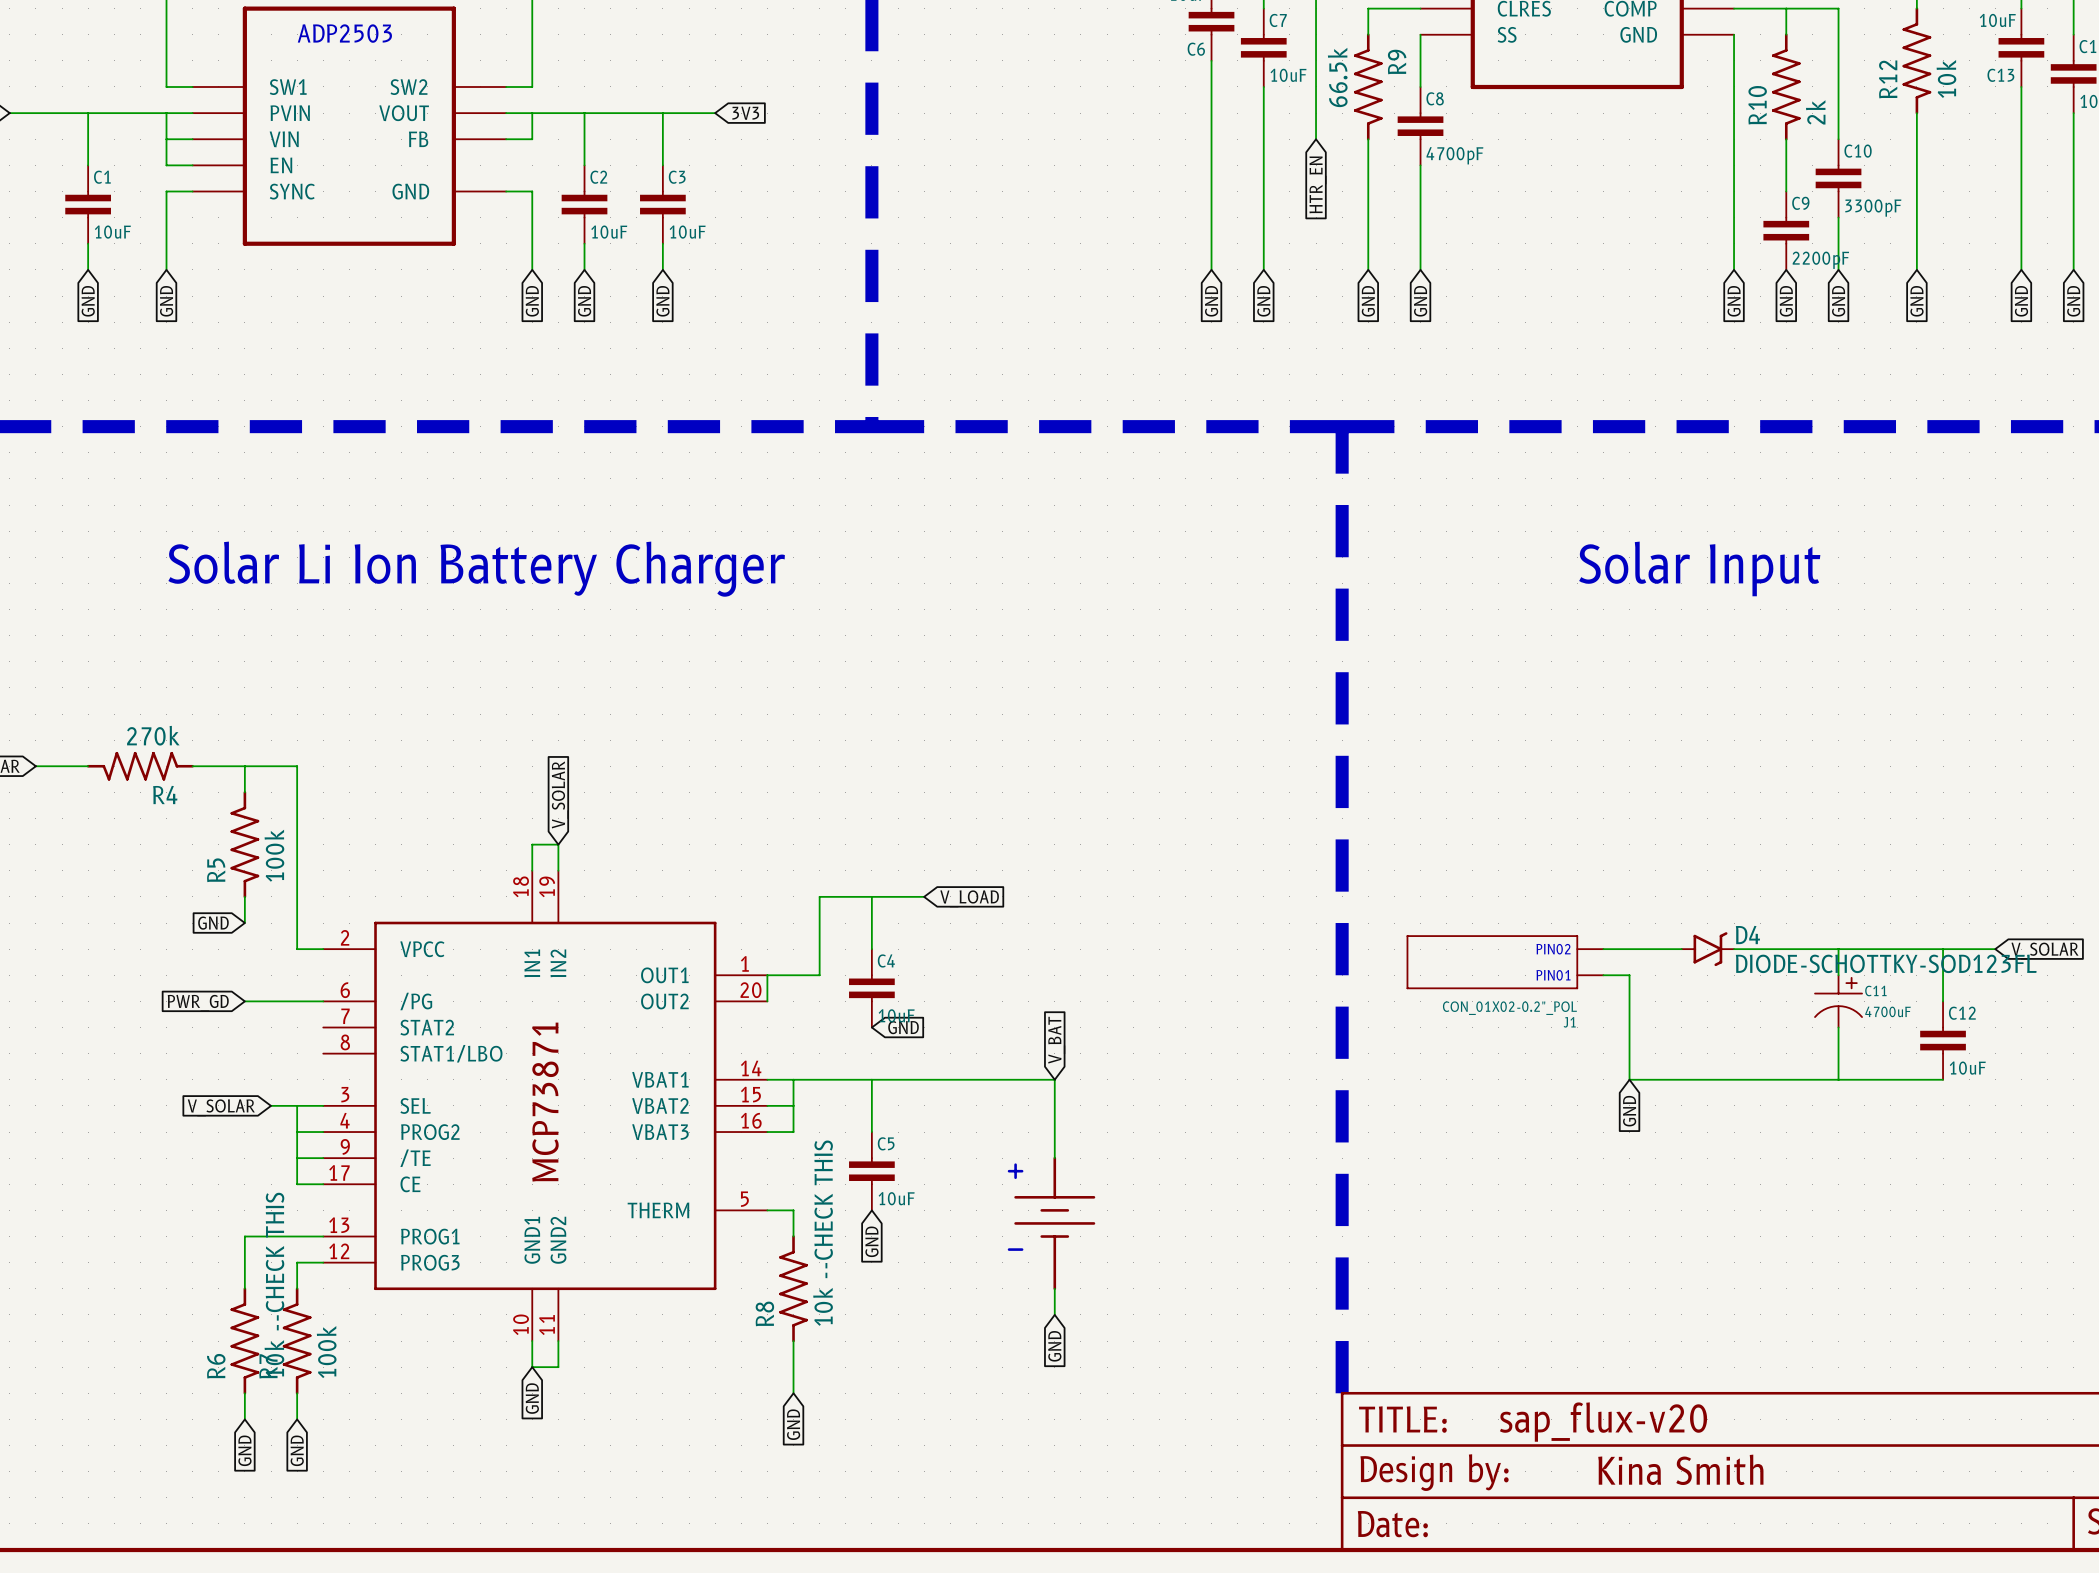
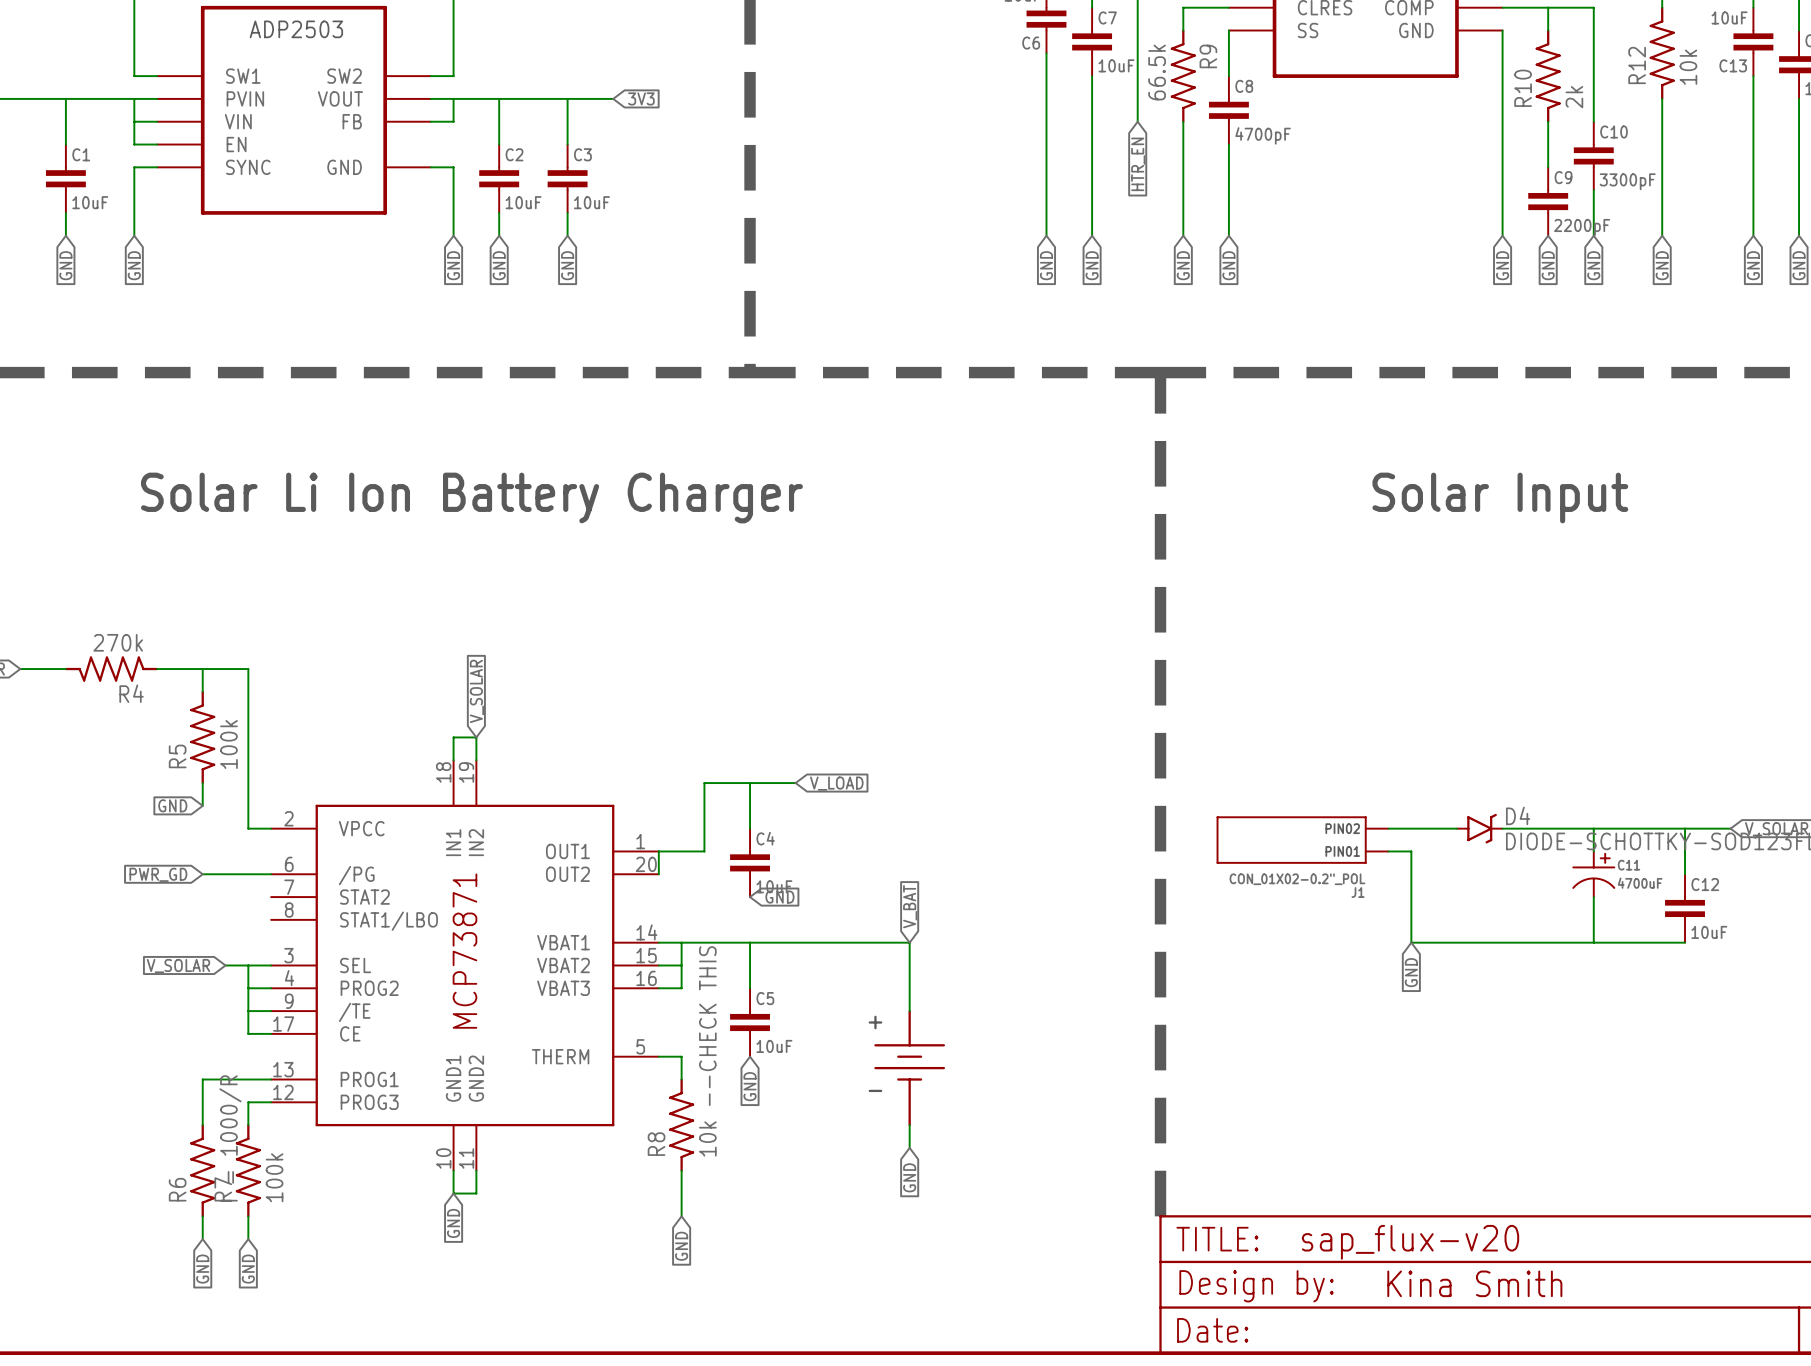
R6 value: 10k --CHECK THIS (274, 1285) -> I = 1000/R (230, 1138)

